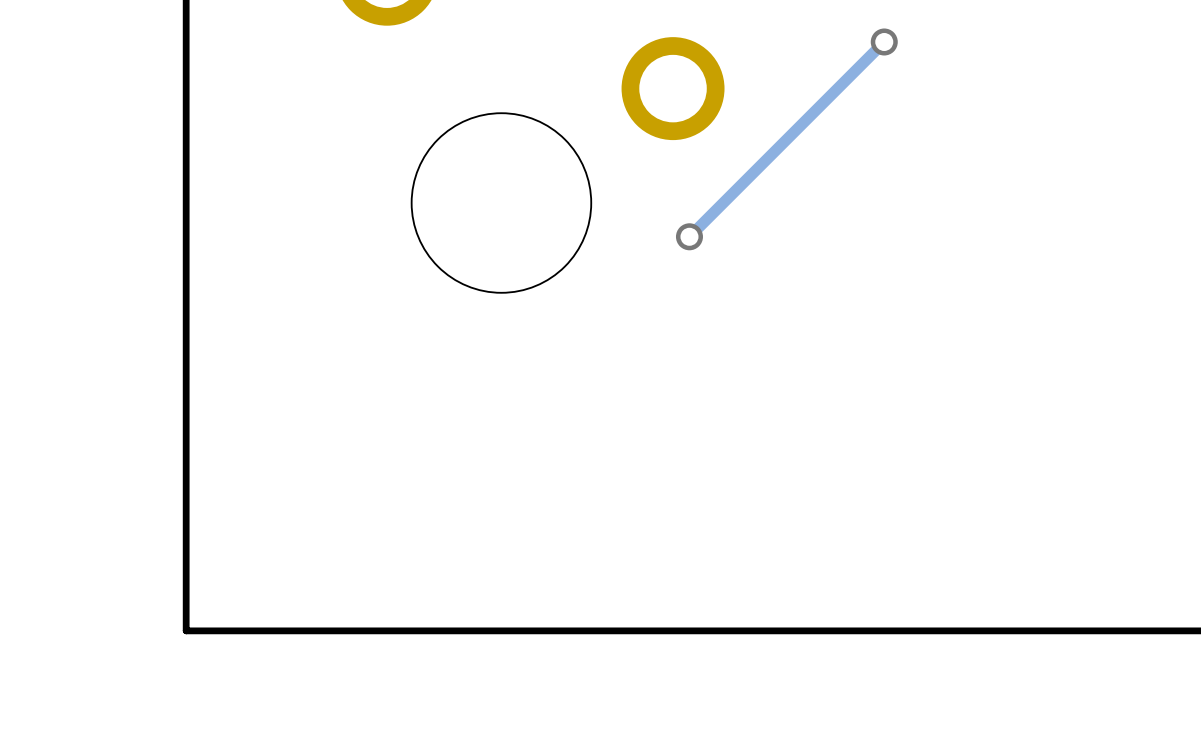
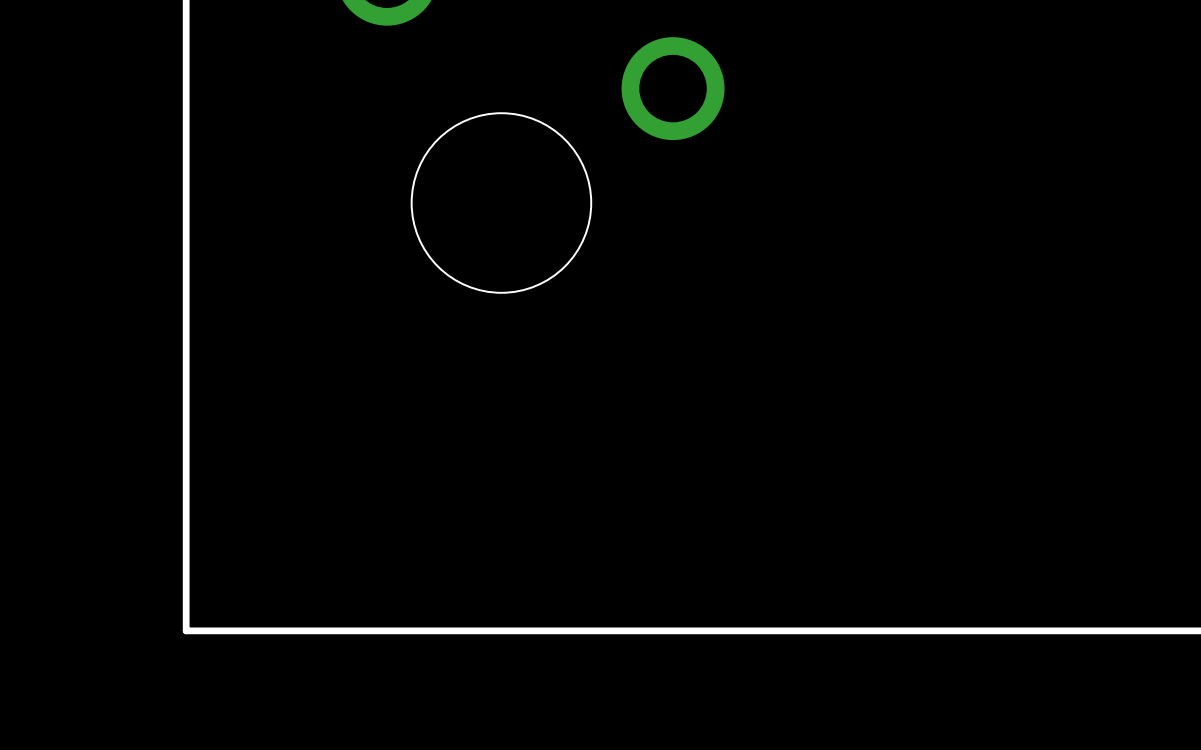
track: (884, 41) (689, 236) -> none
via: (884, 41) -> none
via: (689, 236) -> none

